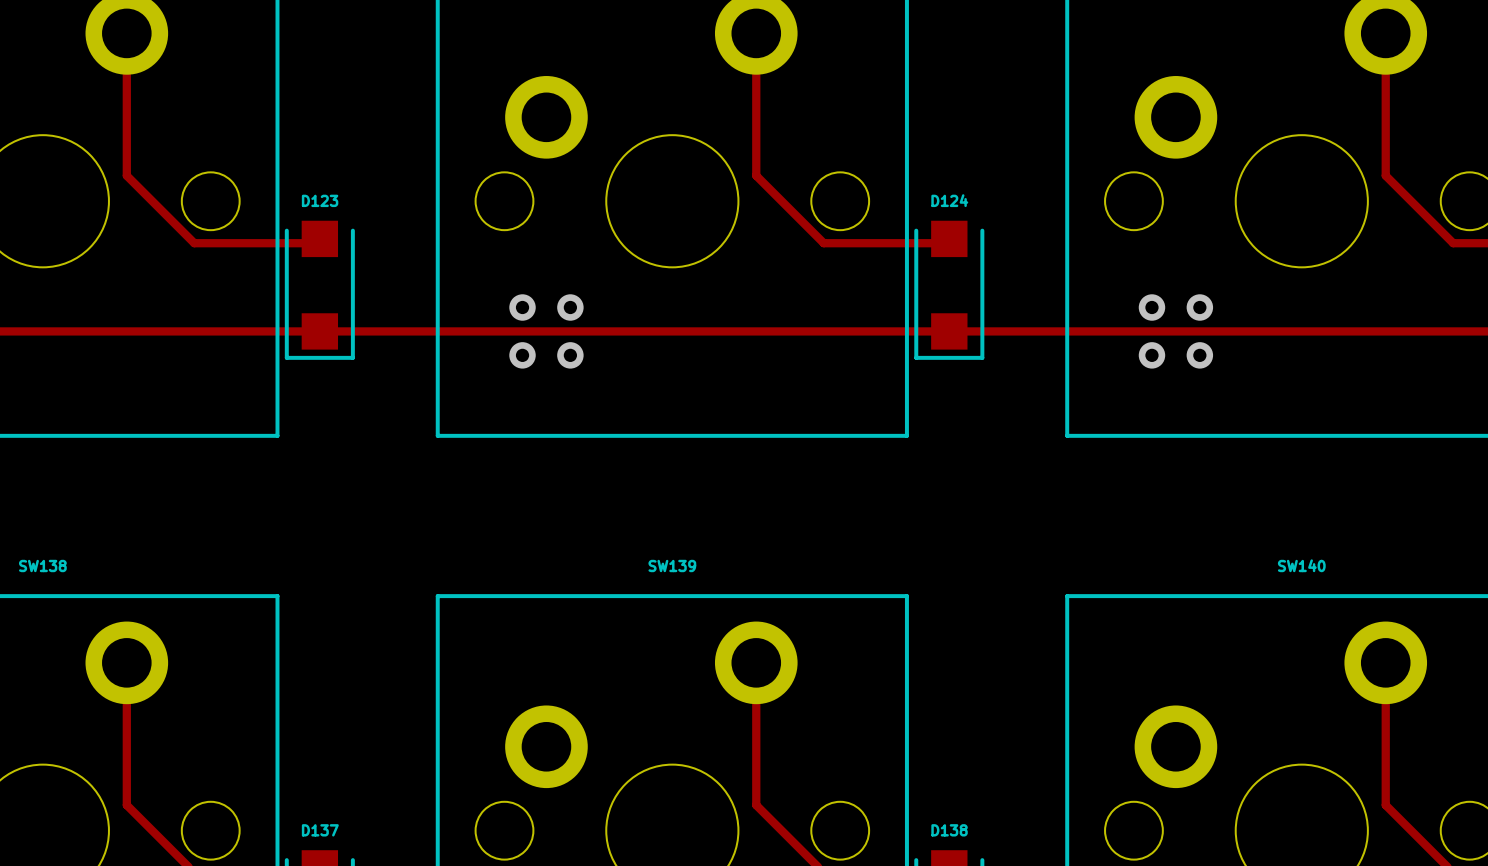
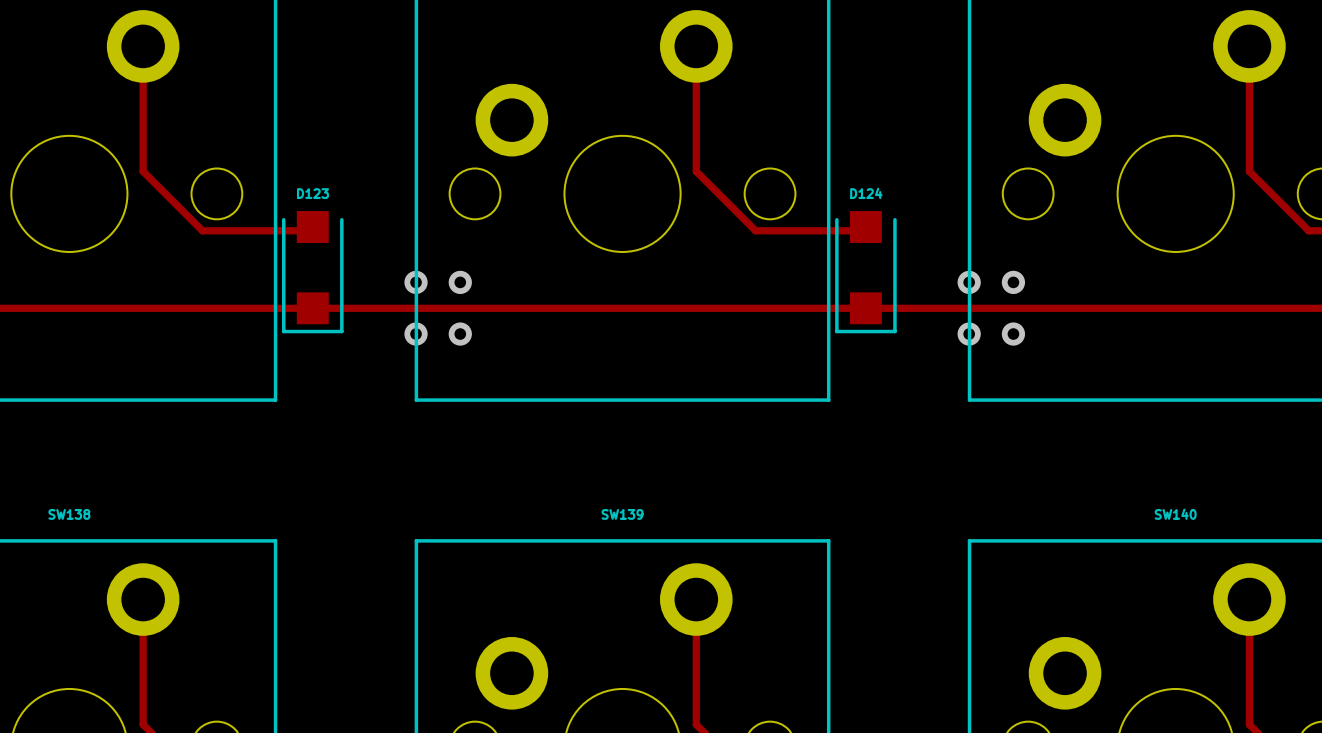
via: none -> (416, 282)
via: none -> (460, 282)
via: none -> (969, 282)
via: none -> (1013, 282)
via: (522, 307) -> none
via: (570, 307) -> none
via: (1151, 307) -> none
via: (1199, 307) -> none
via: (522, 355) -> none
via: (570, 355) -> none
via: (1151, 355) -> none
via: (1199, 355) -> none
via: none -> (416, 334)
via: none -> (460, 334)
via: none -> (969, 334)
via: none -> (1013, 334)

